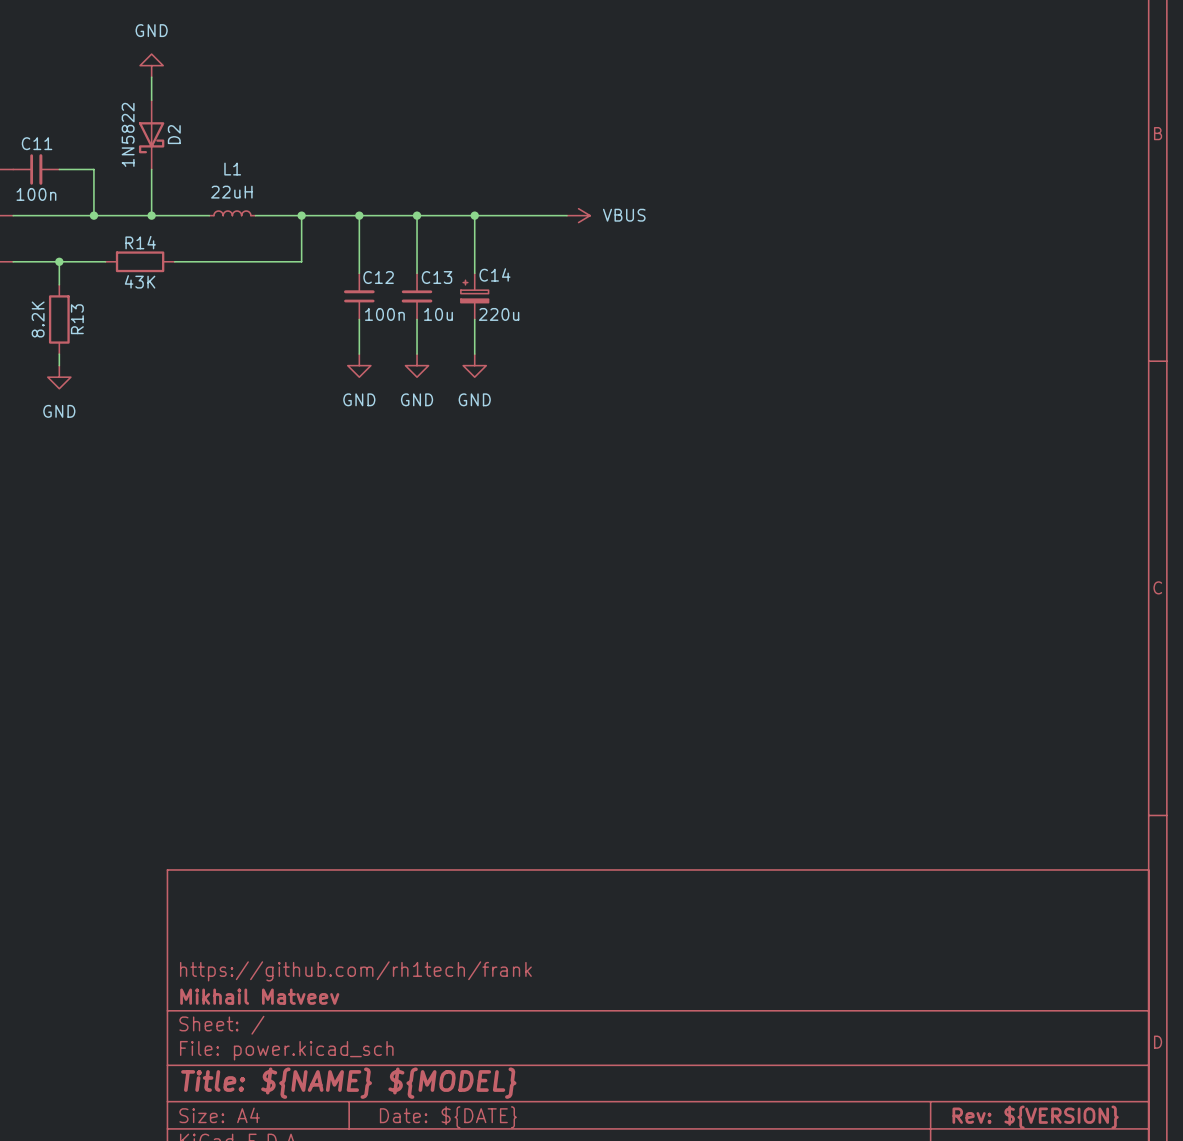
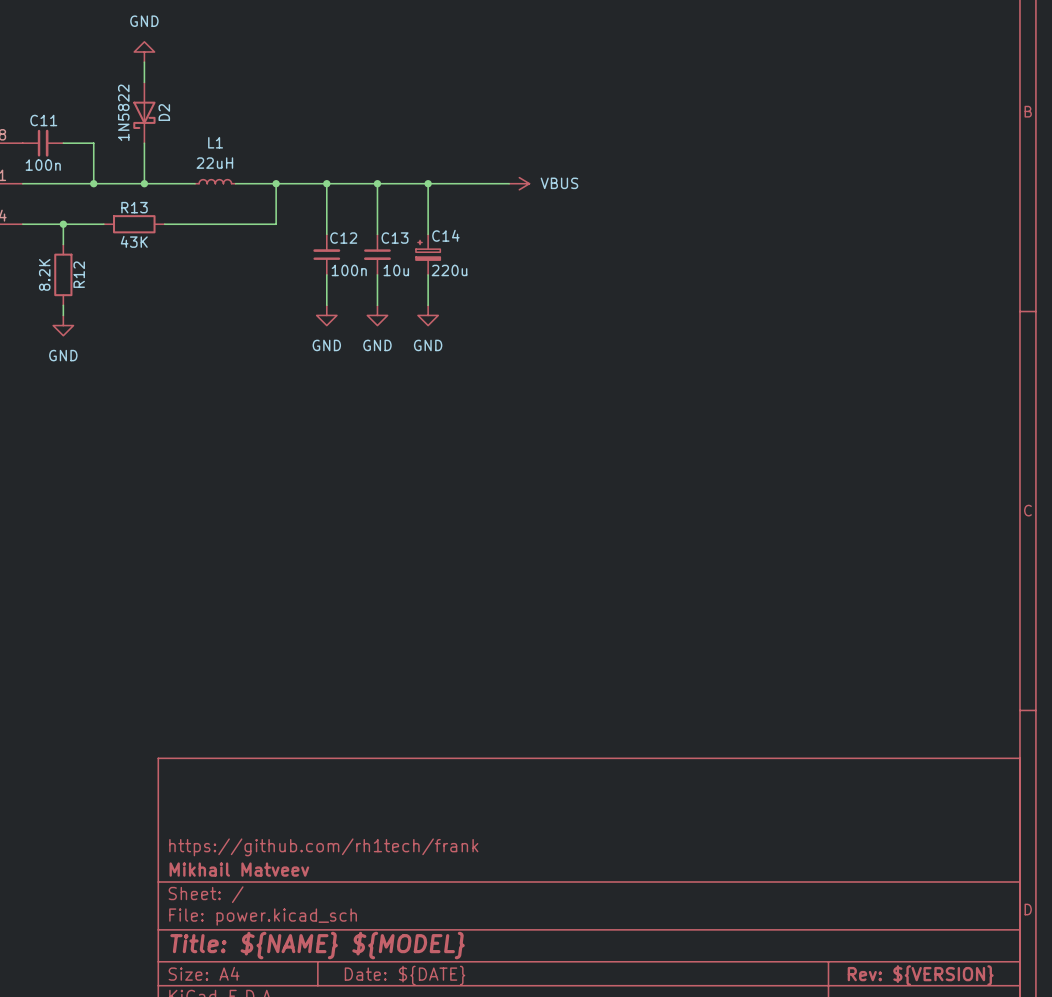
R14 name: R14 (140, 242) -> R13 (134, 207)
R13 name: R13 (77, 319) -> R12 (79, 274)

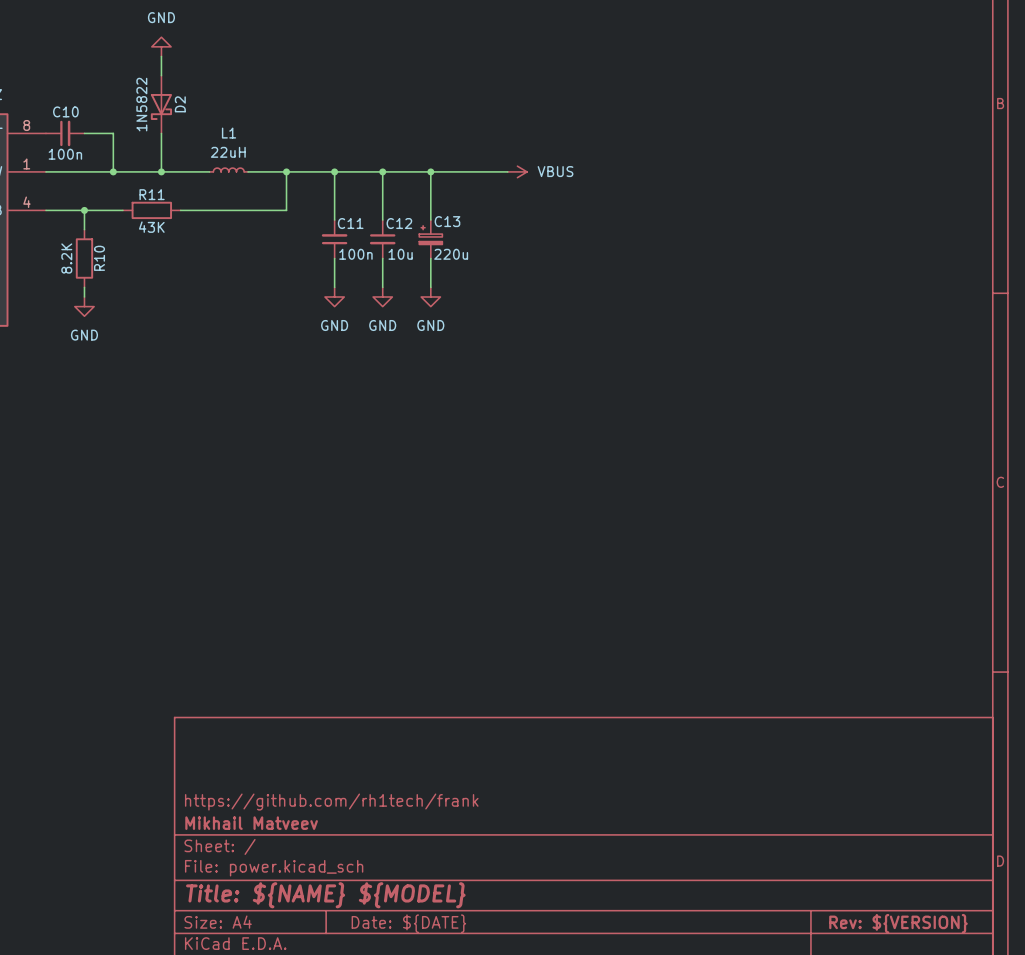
C11 name: C11 (43, 120) -> C10 (65, 111)
R13 name: R13 (134, 207) -> R11 (152, 194)
C14 name: C14 (445, 235) -> C13 (447, 221)
C12 name: C12 (343, 238) -> C11 (350, 223)
C13 name: C13 (395, 238) -> C12 (399, 223)
R12 name: R12 (79, 274) -> R10 (99, 258)

